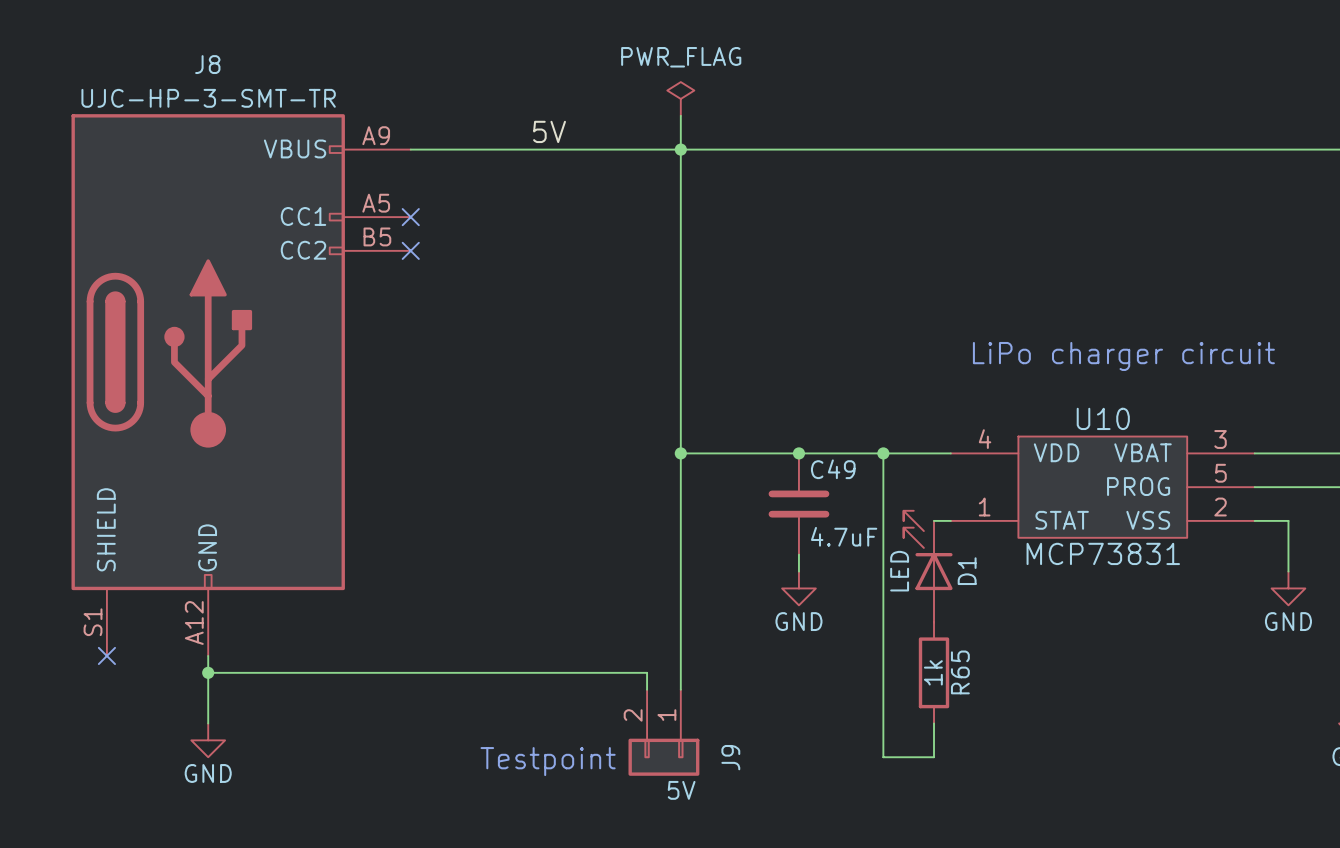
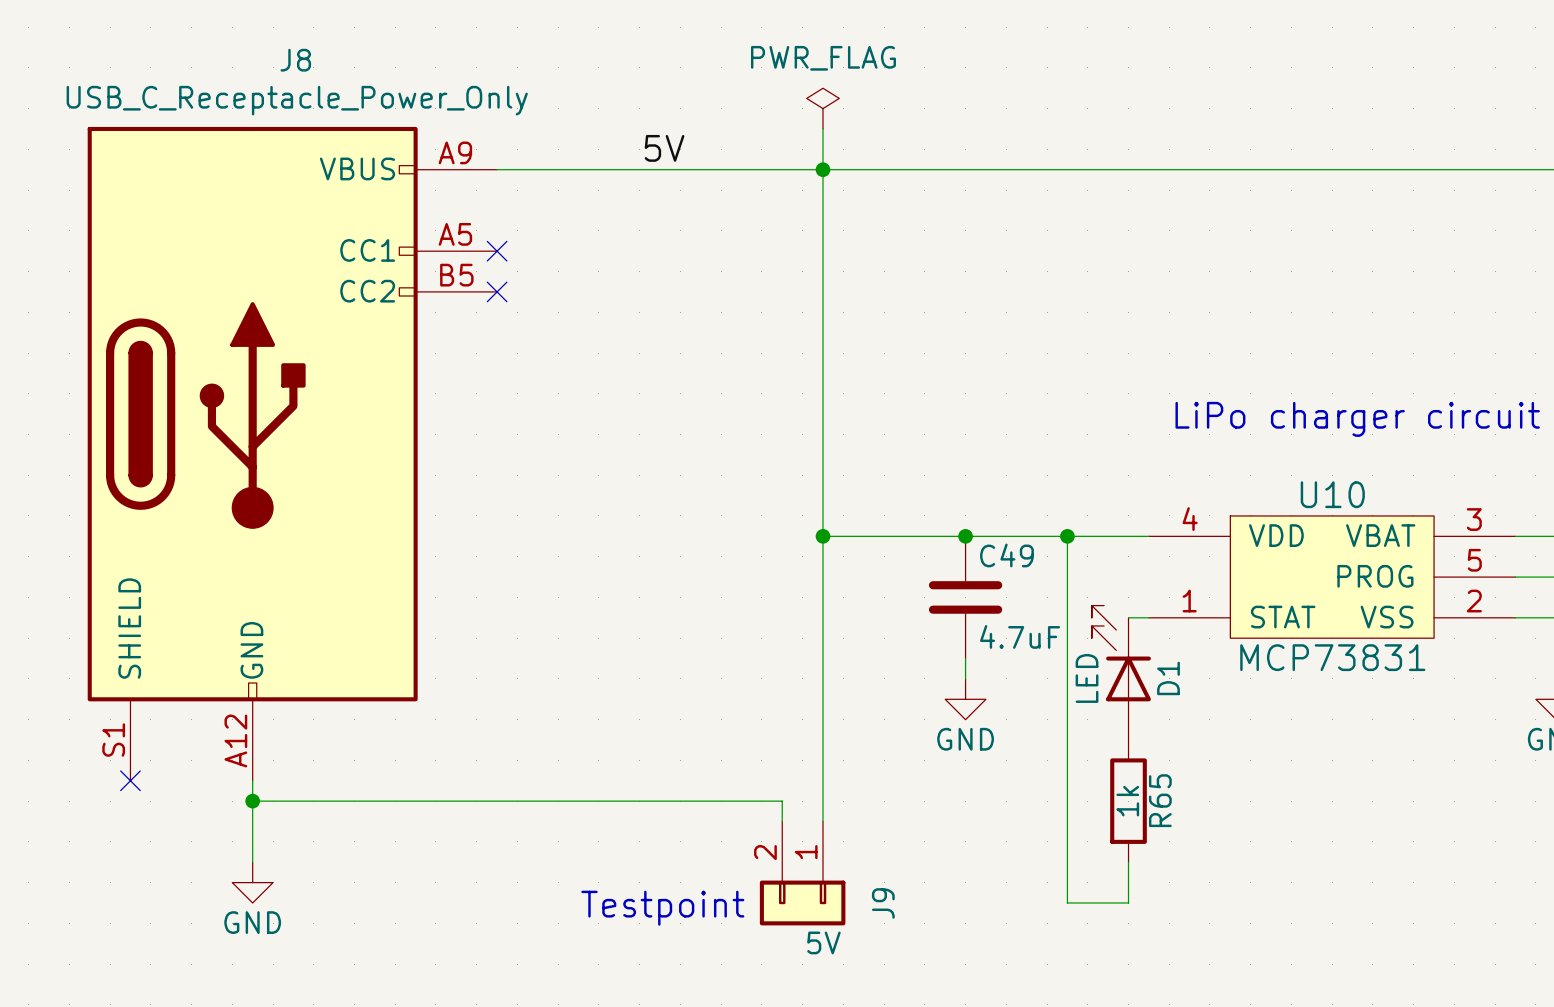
J8 name position: J8 (207, 64) -> J8 (295, 60)
J8 value: UJC-HP-3-SMT-TR (208, 98) -> USB_C_Receptacle_Power_Only (297, 100)

